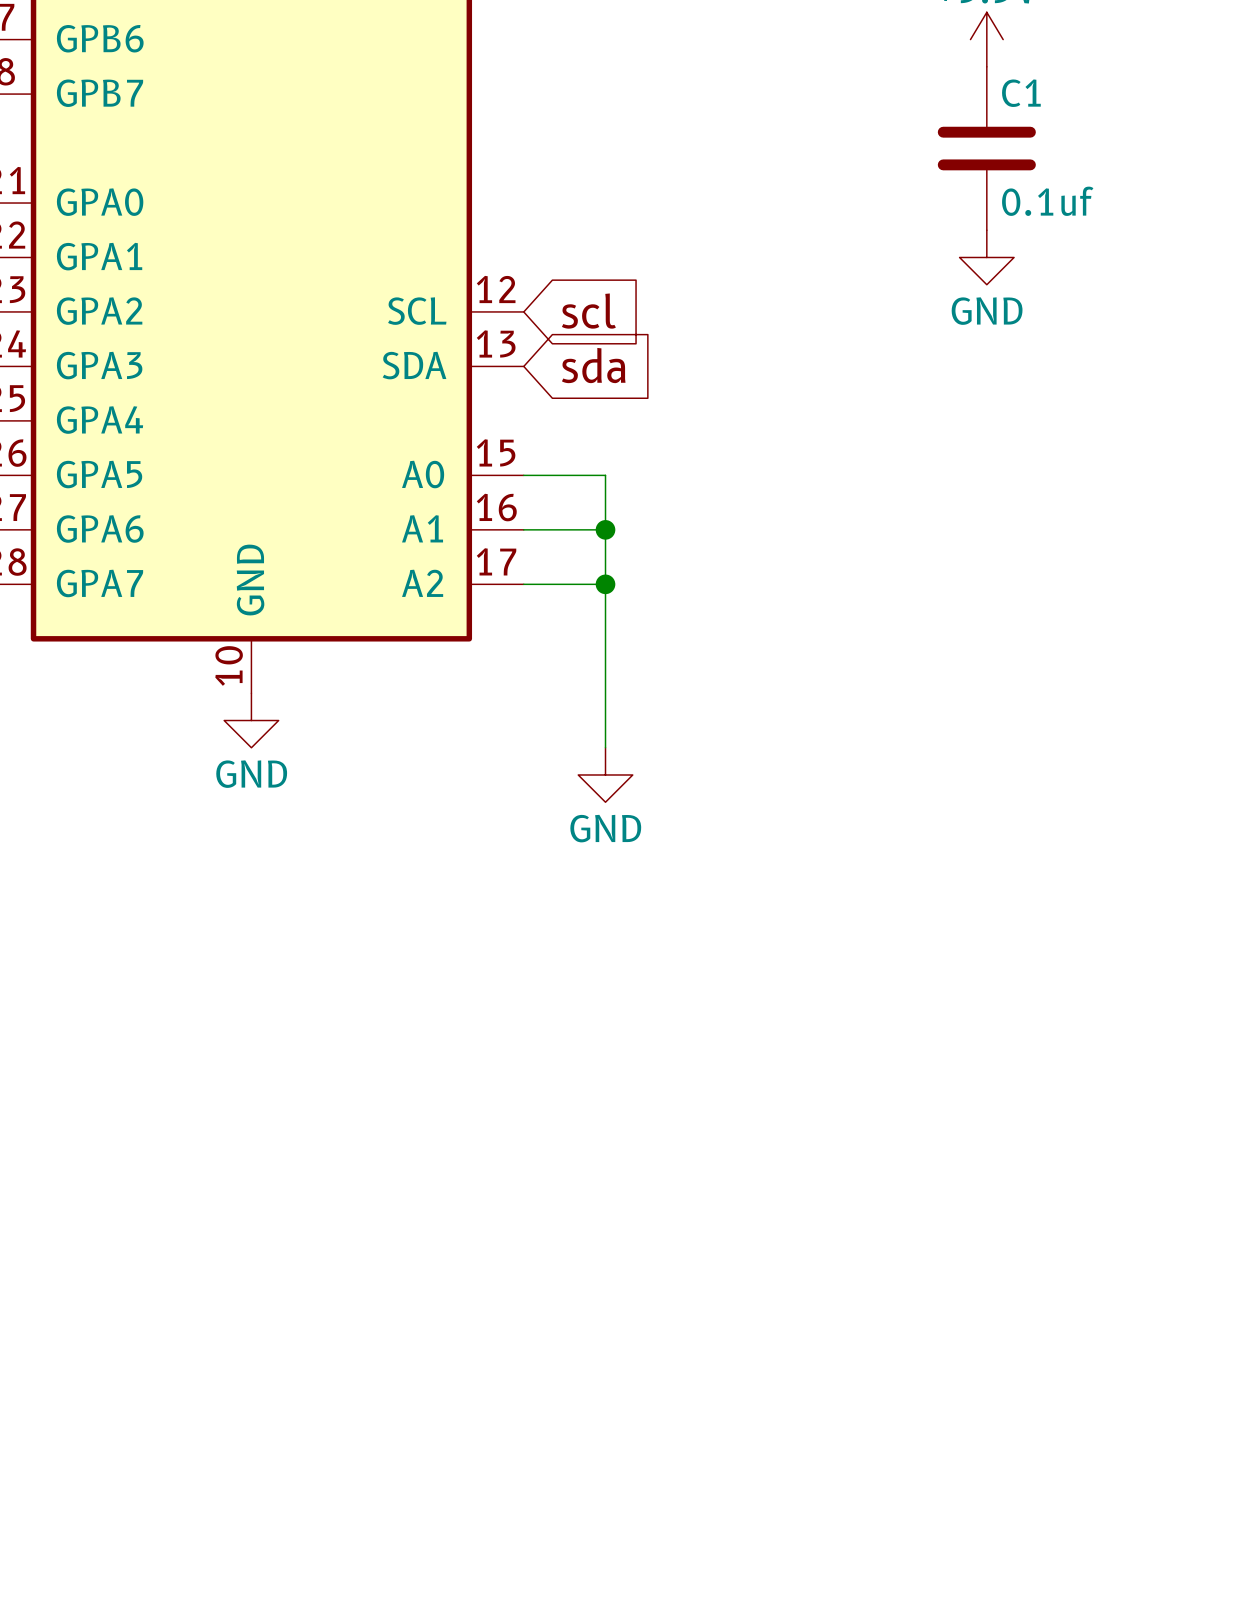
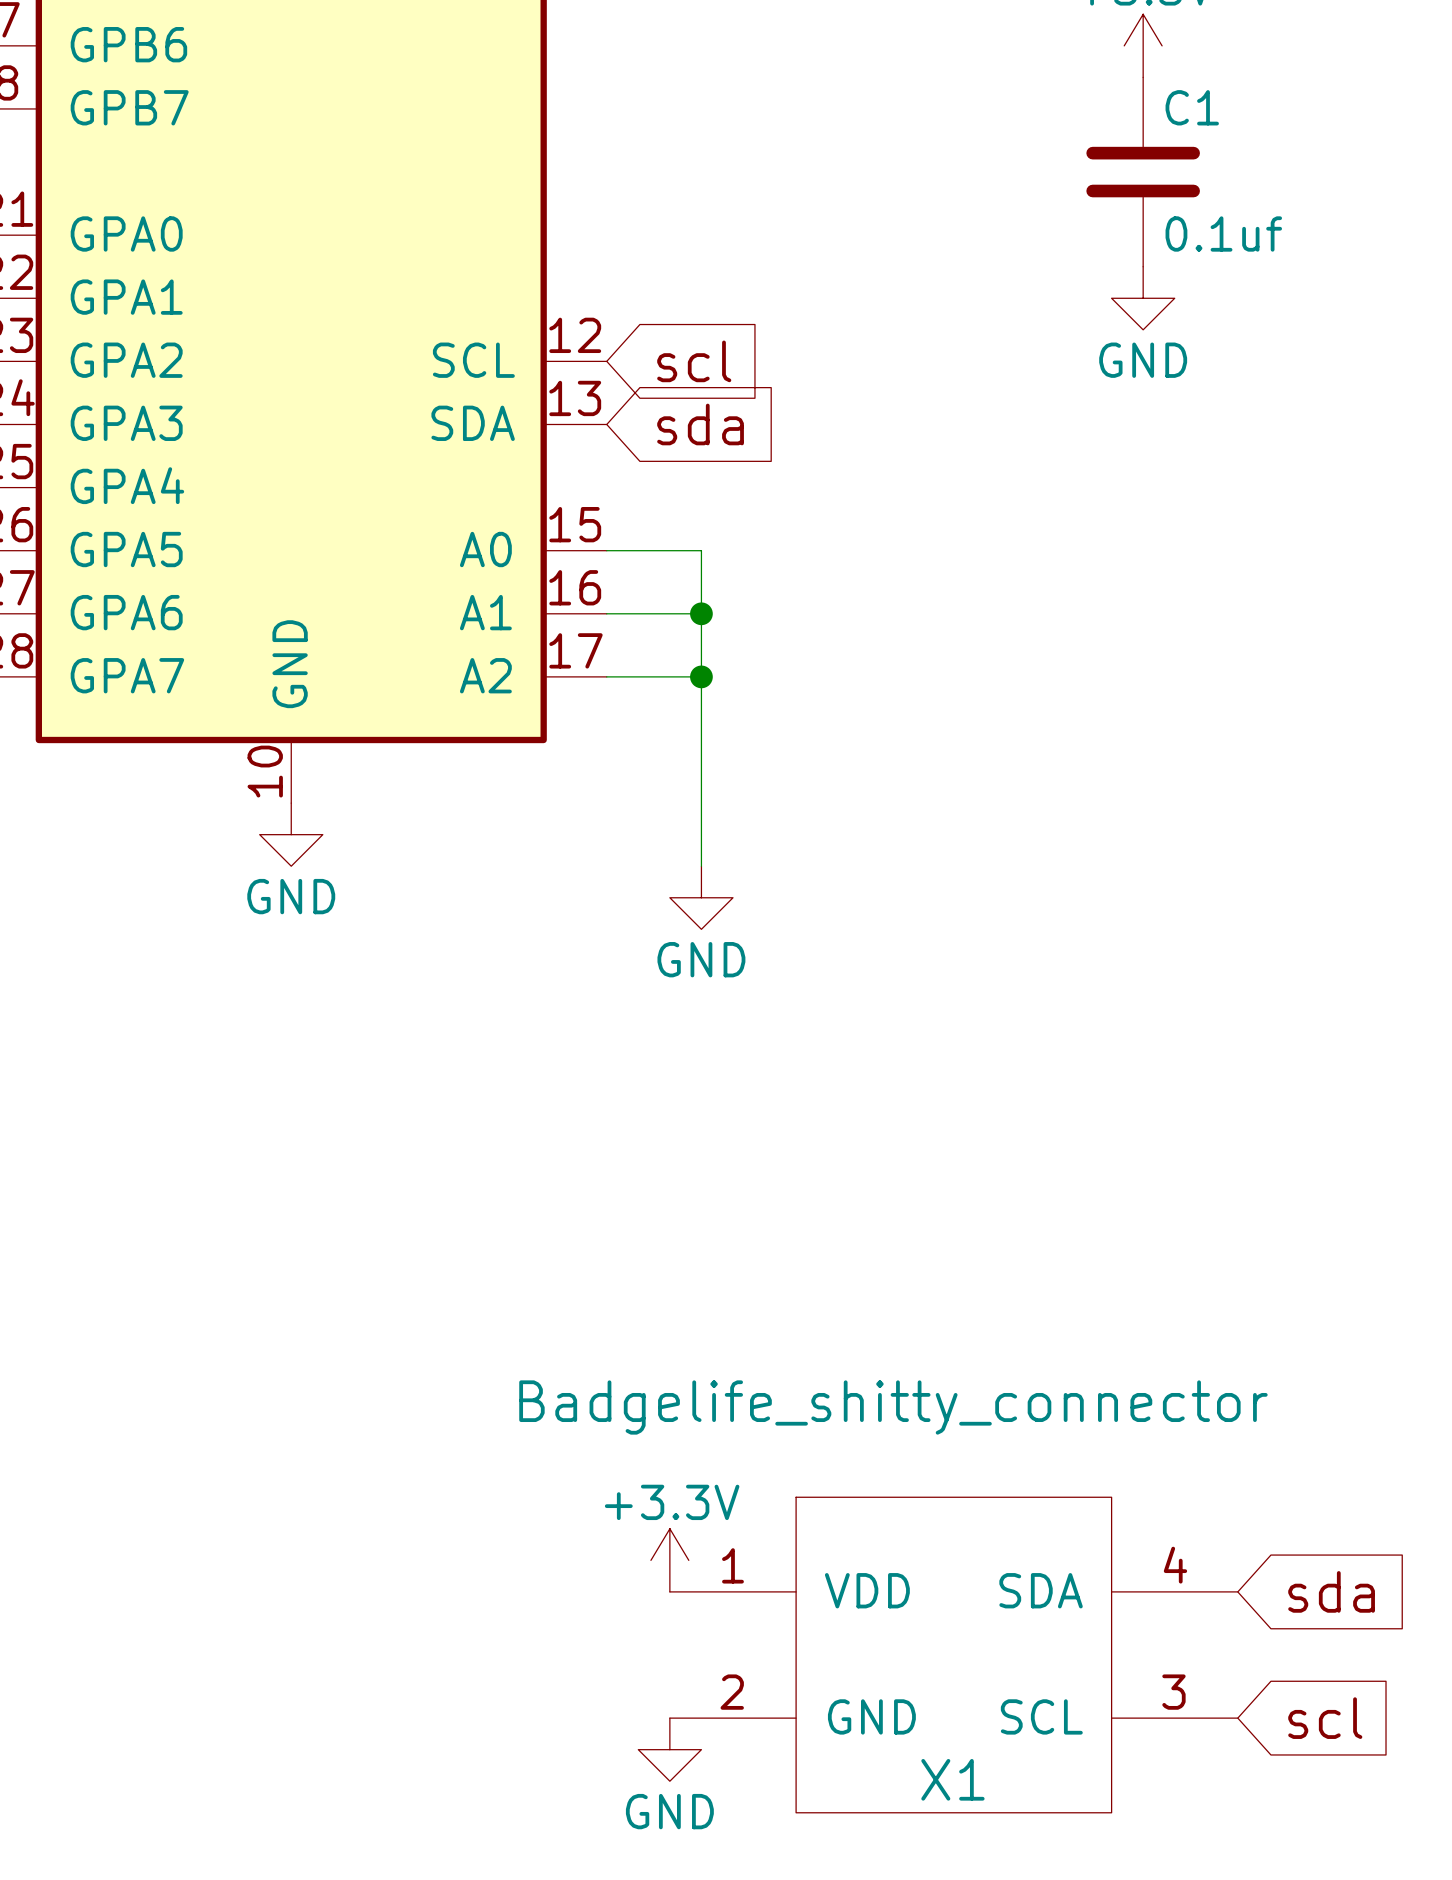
power symbol: none -> +3.3V (669, 1560)
global label: none -> sda (1331, 1591)
X1: none -> Badgelife_shitty_connector (953, 1655)
global label: none -> scl (1325, 1718)
power symbol: none -> GND (669, 1749)

